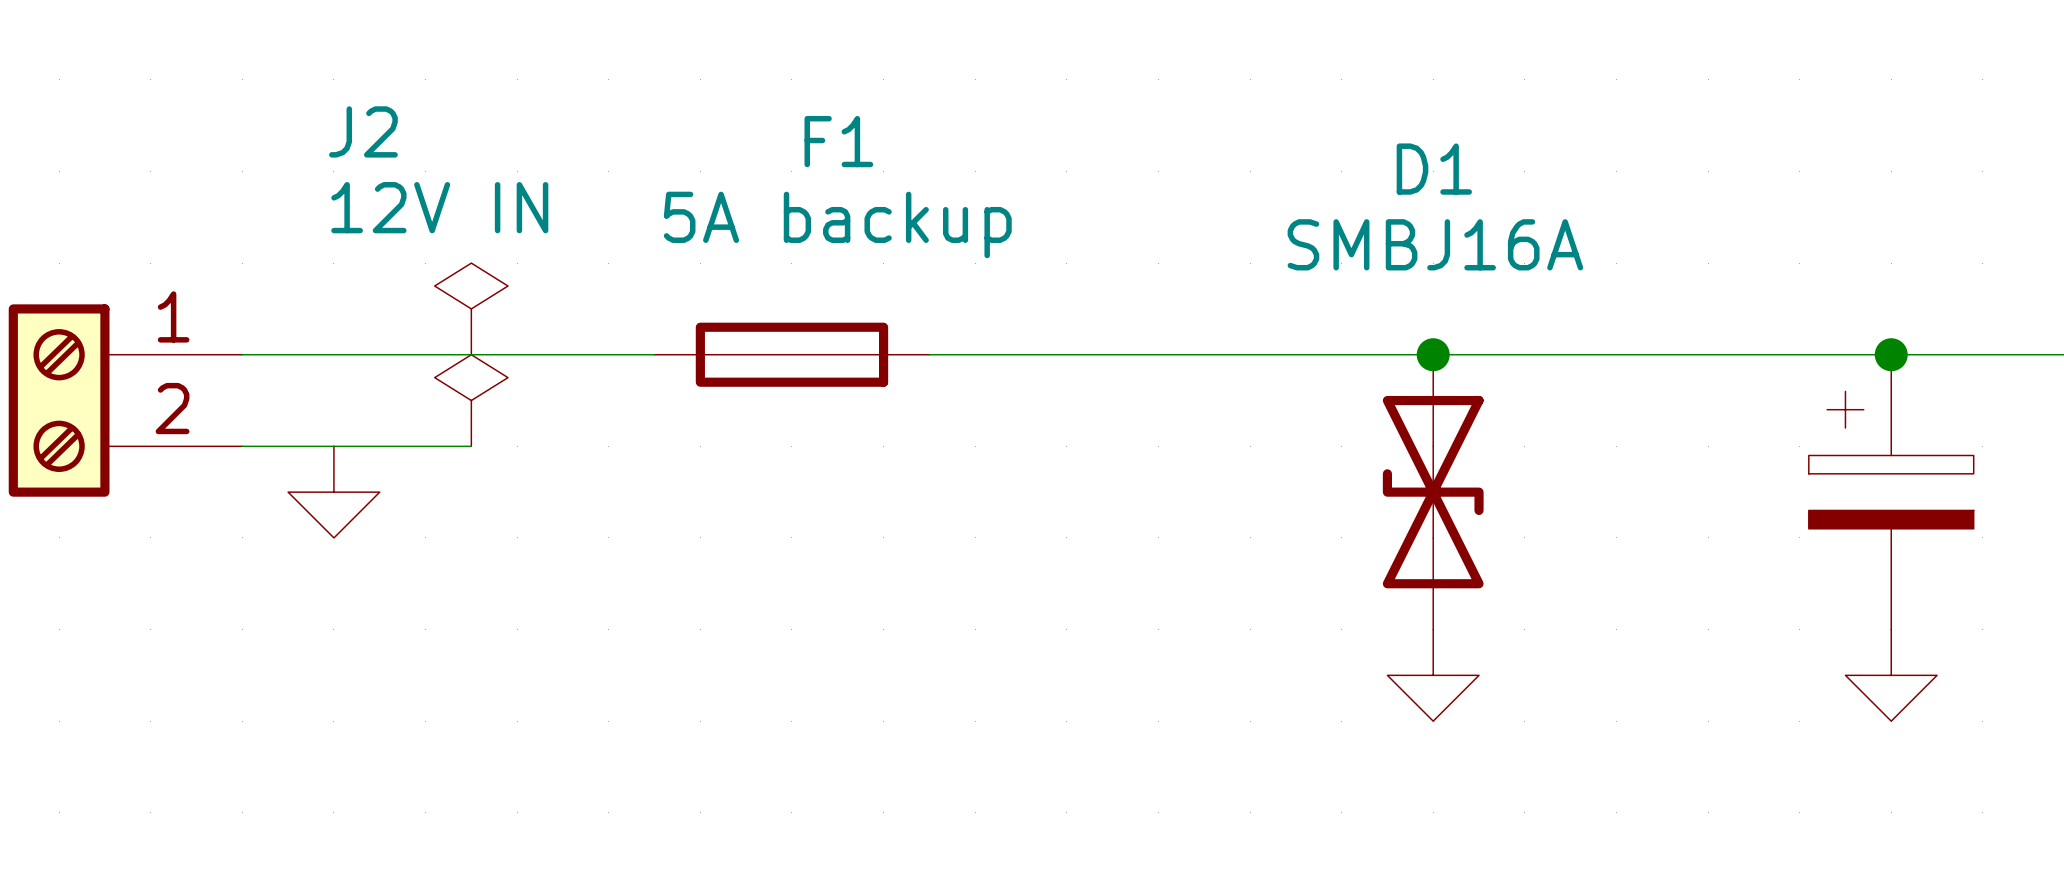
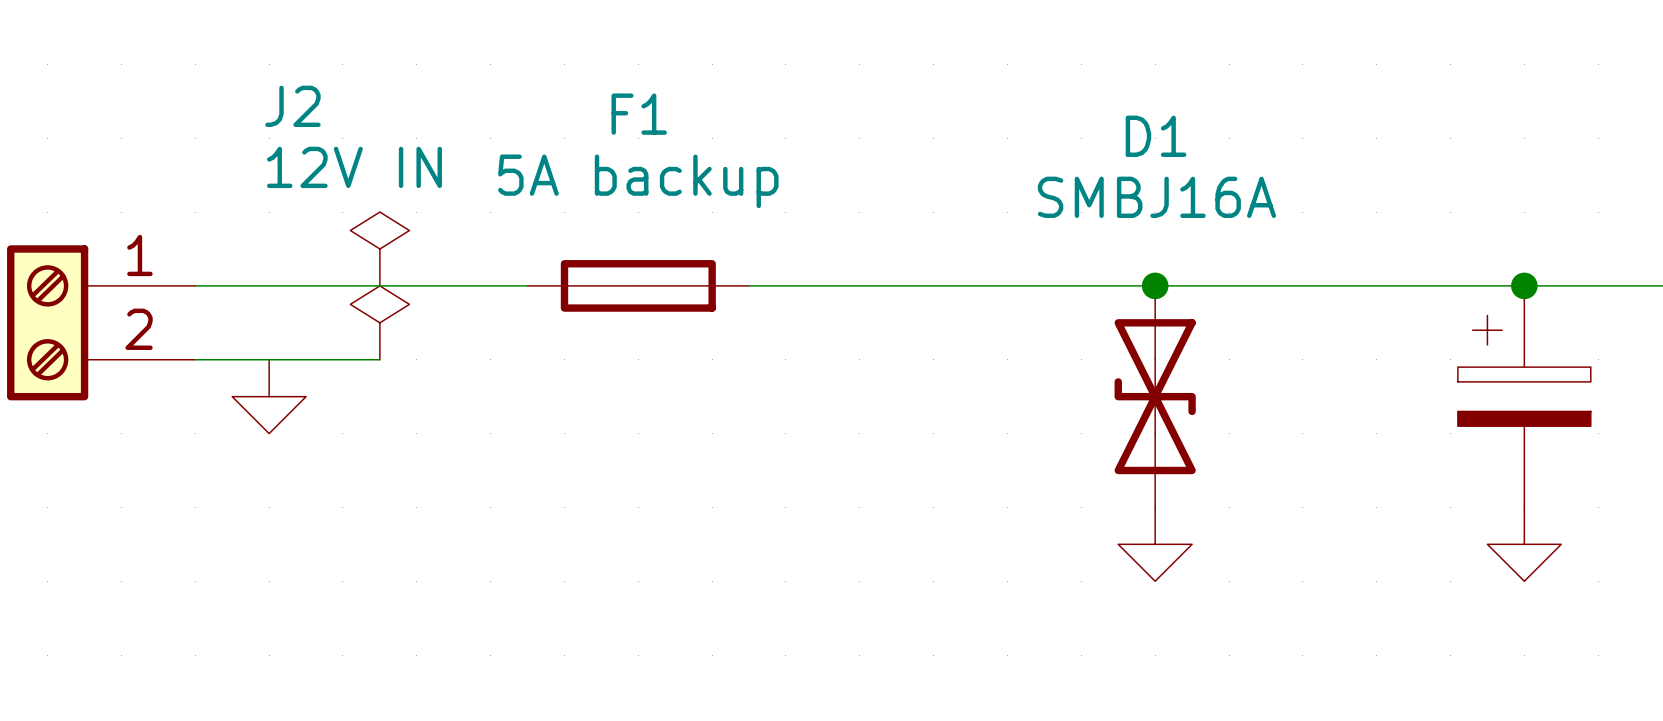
F1 name position: F1 (838, 141) -> F1 (639, 114)
F1 value position: 5A backup (837, 224) -> 5A backup (638, 181)

